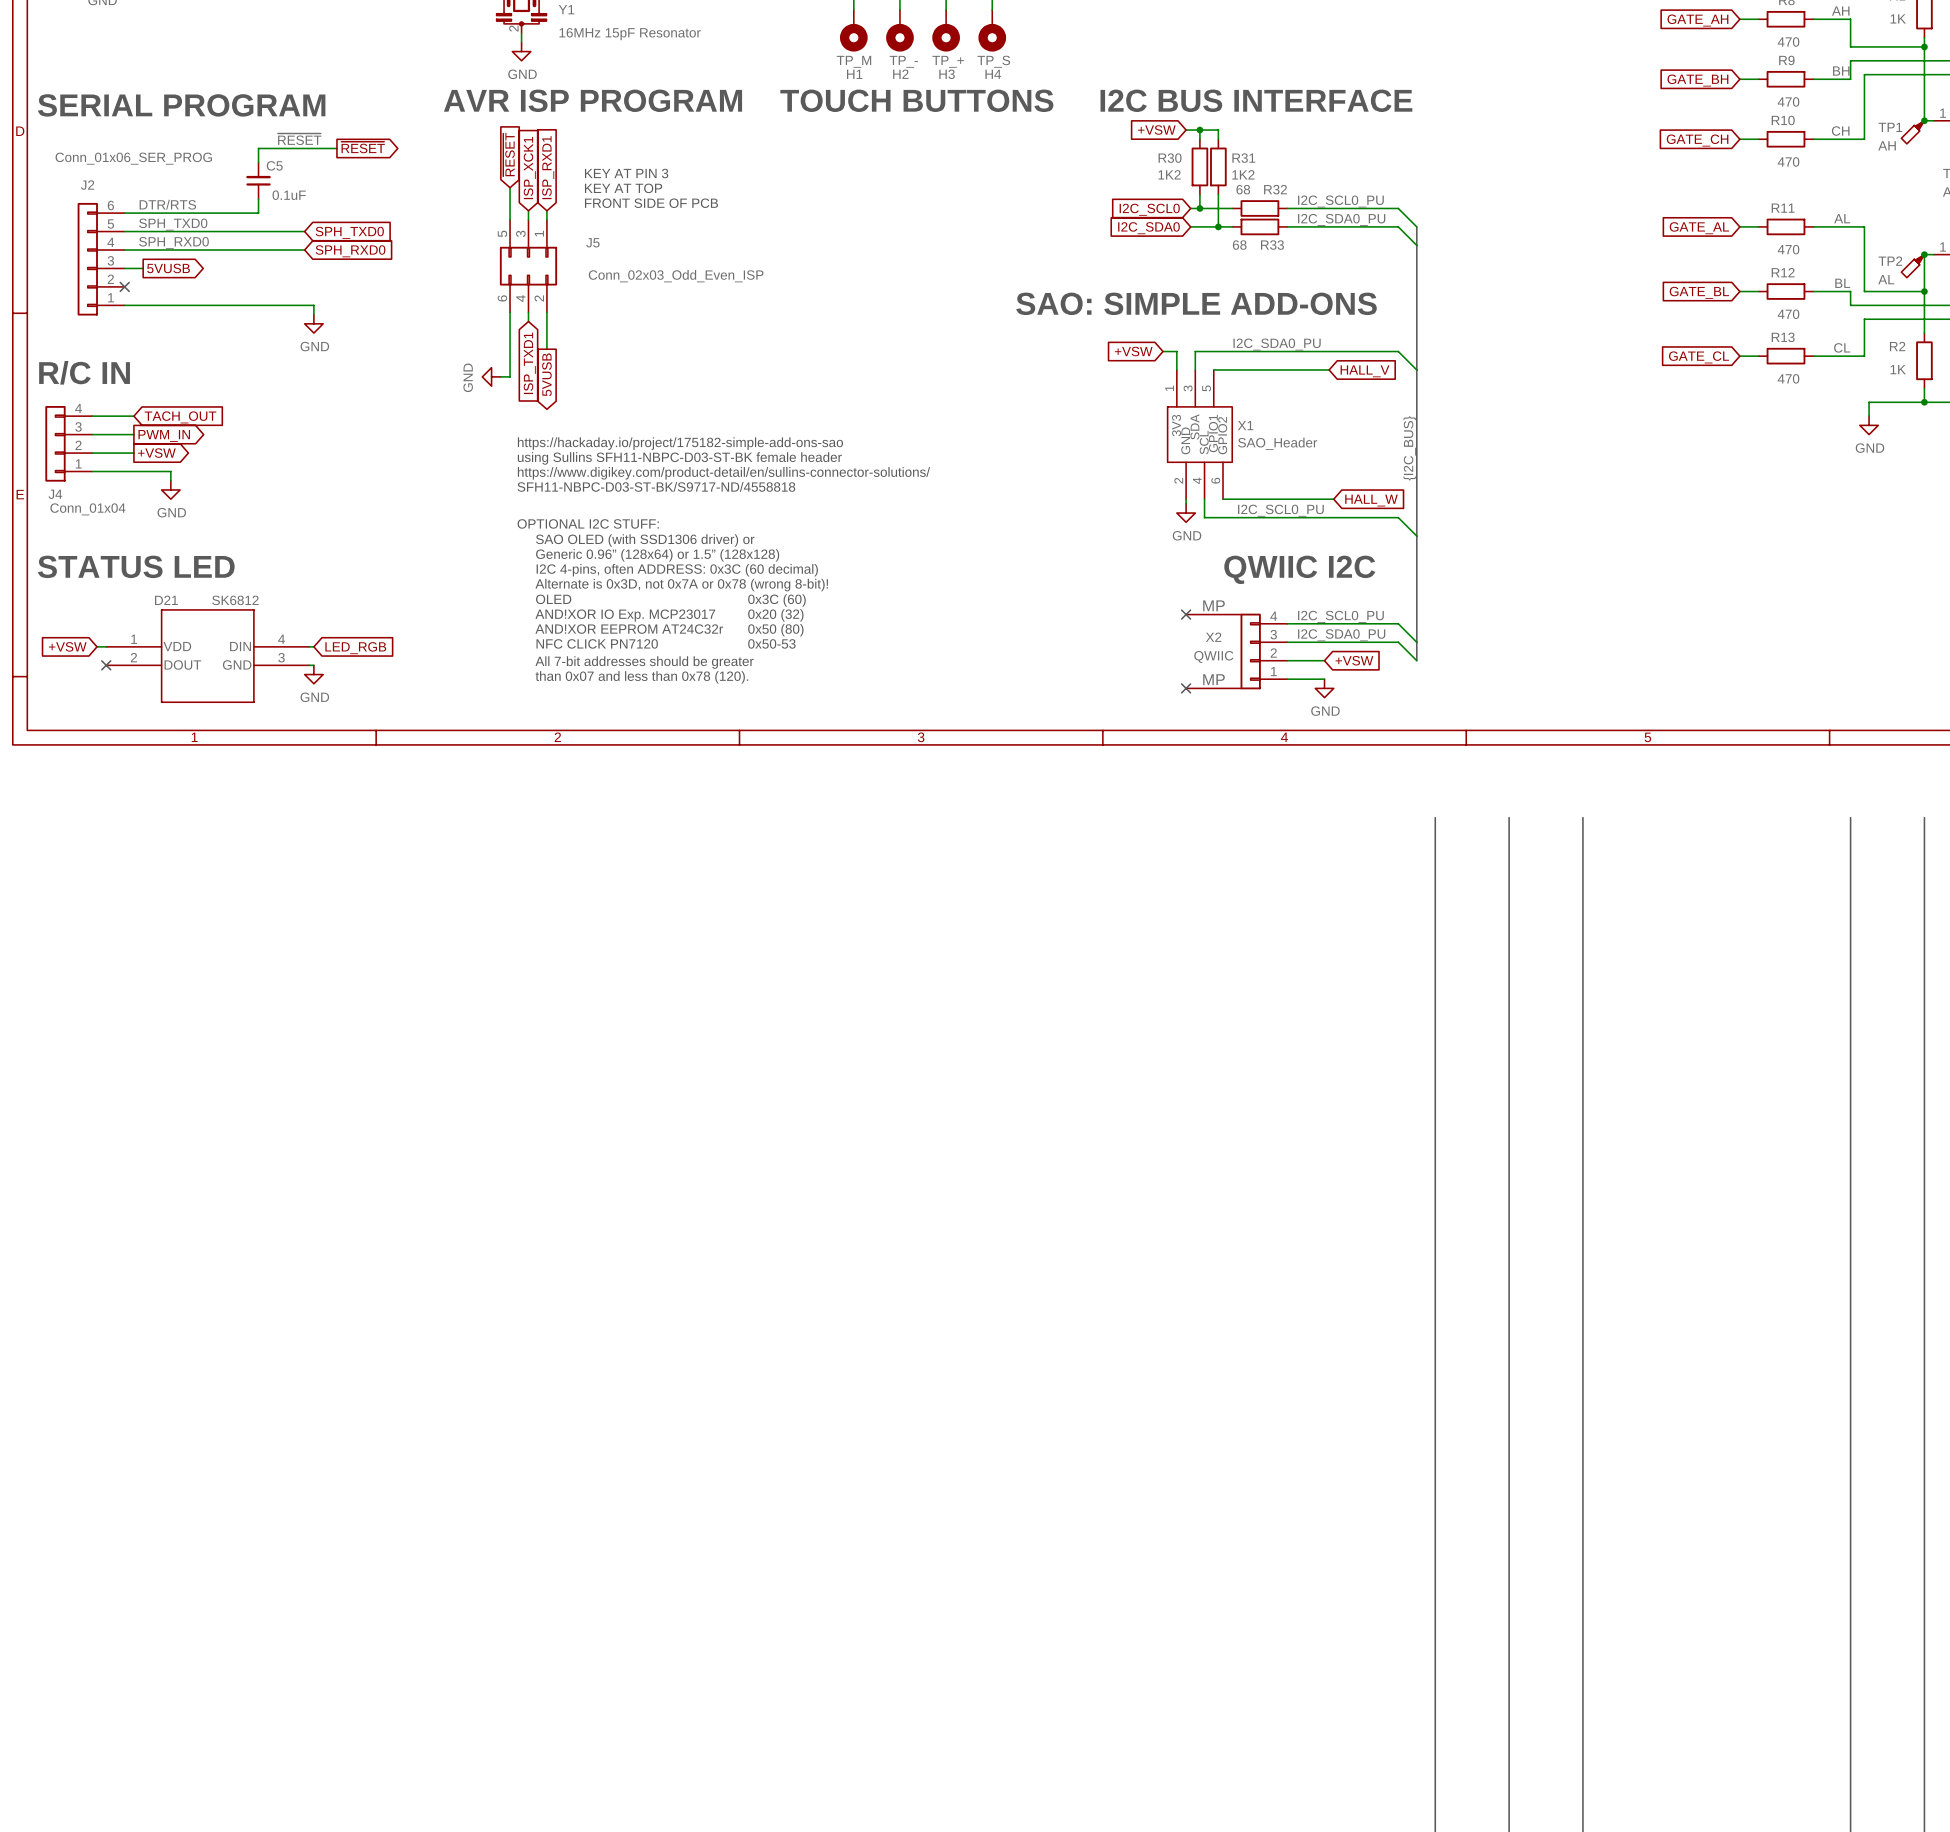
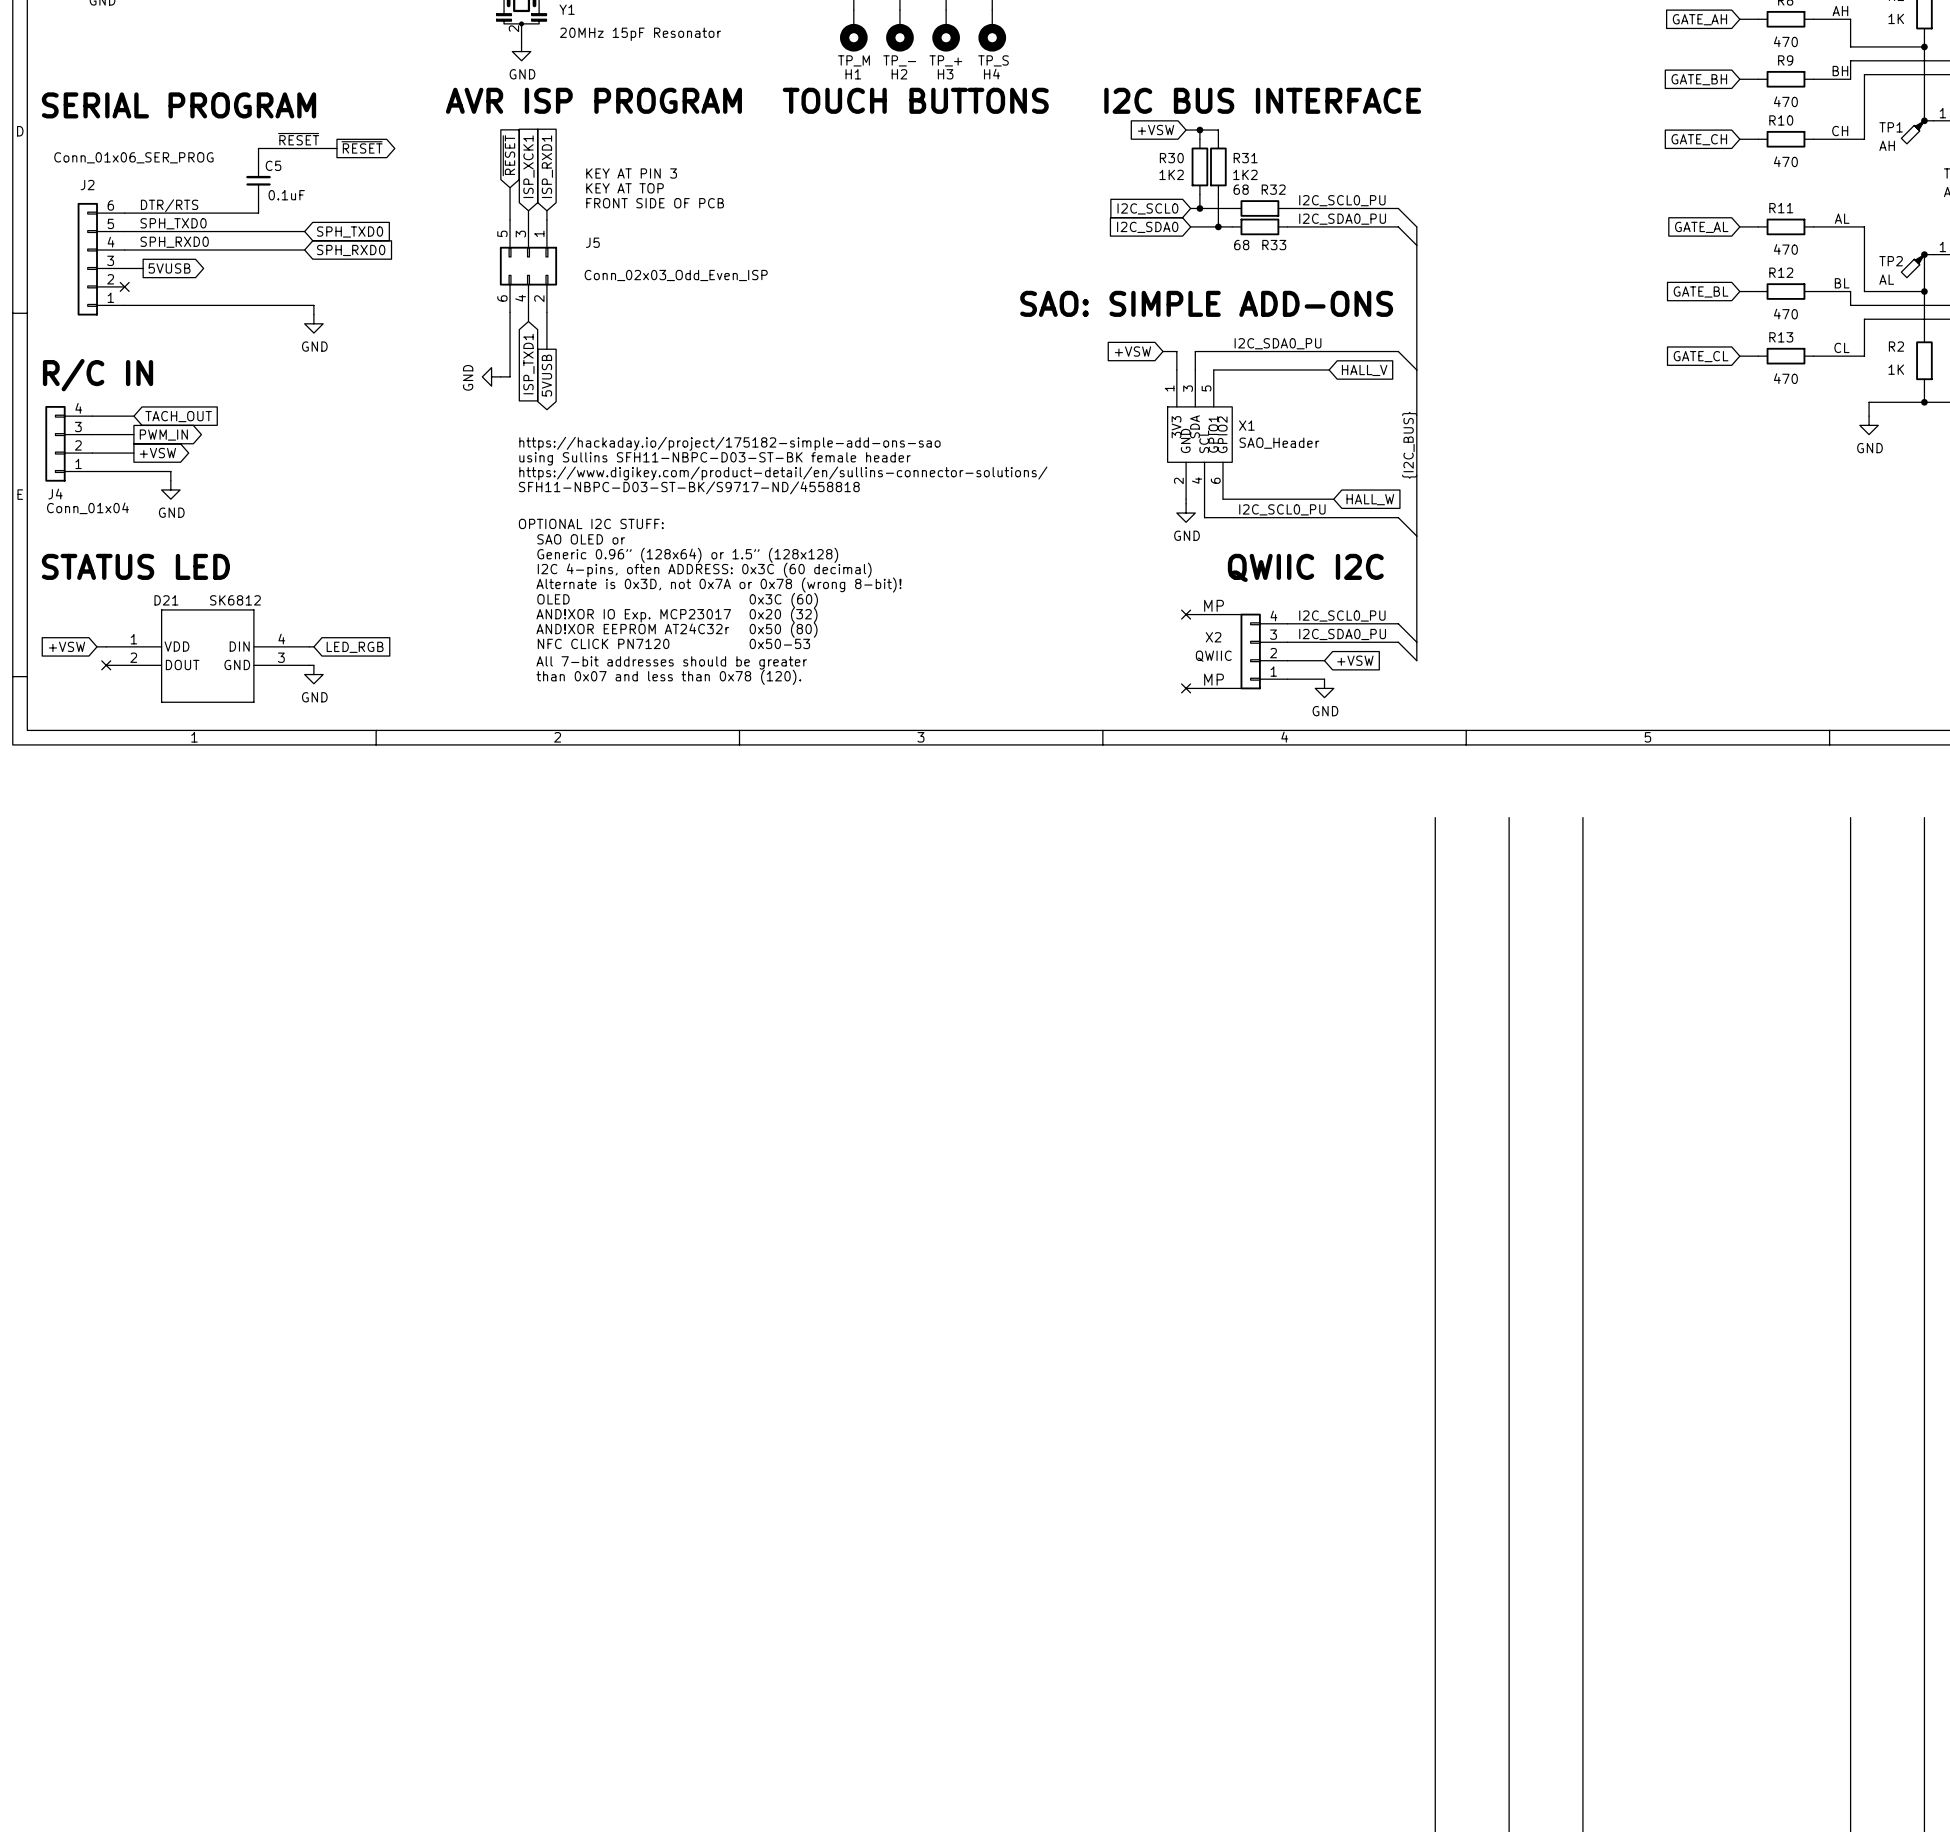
Y1 value: 16MHz 15pF Resonator (630, 34) -> 20MHz 15pF Resonator (640, 34)
text: SAO OLED (with SSD1306 driver) or (645, 540) -> SAO OLED or (581, 539)

